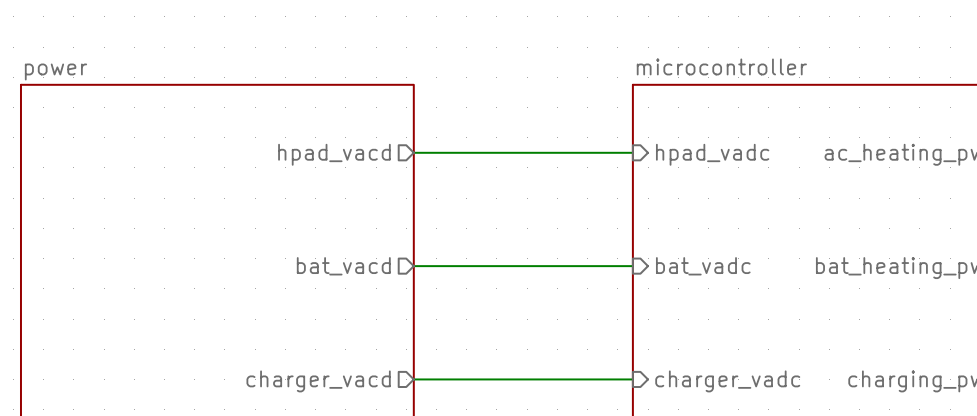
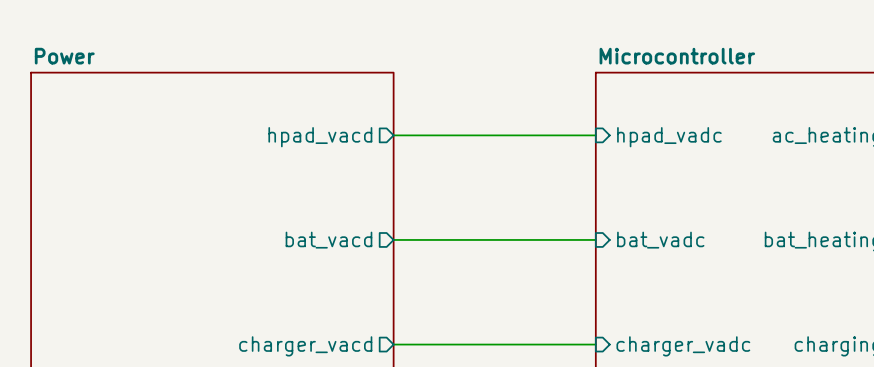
sheet microcontroller name: microcontroller (721, 66) -> Microcontroller (677, 56)
sheet power name: power (55, 71) -> Power (64, 56)

